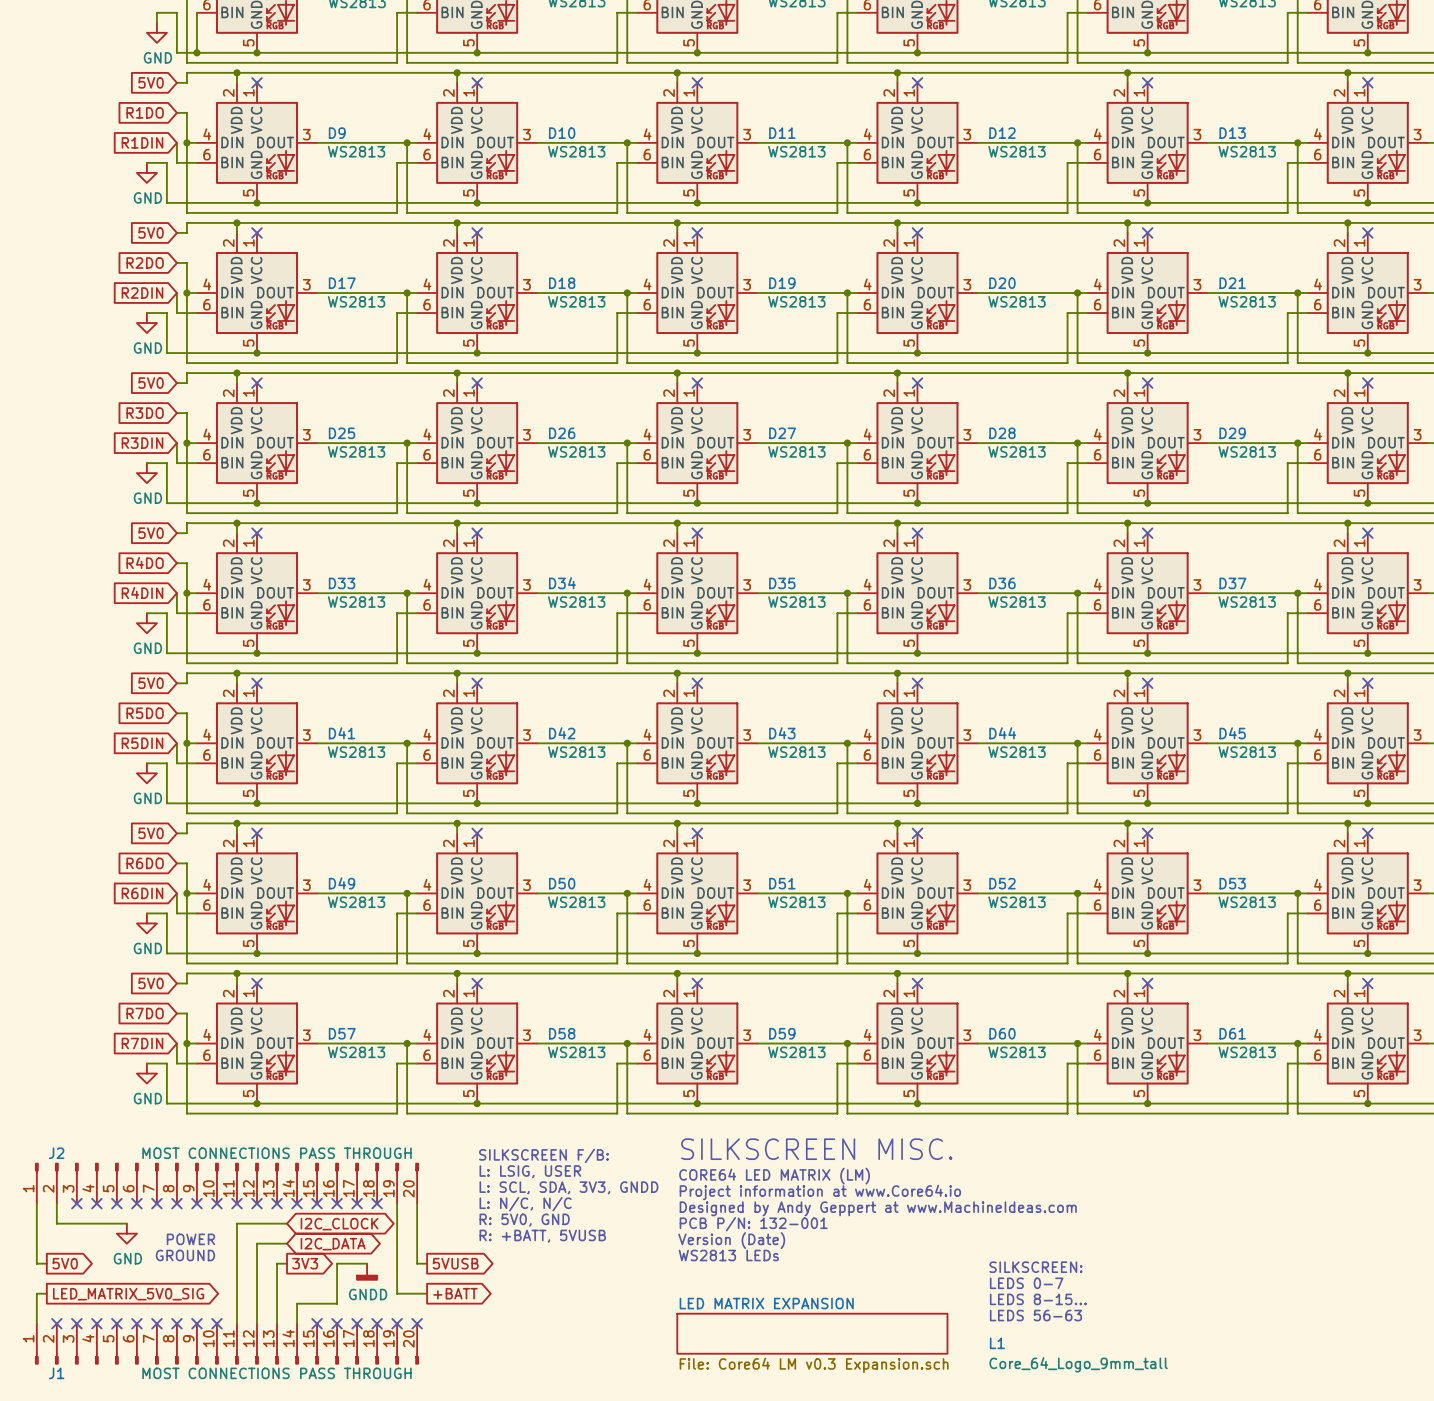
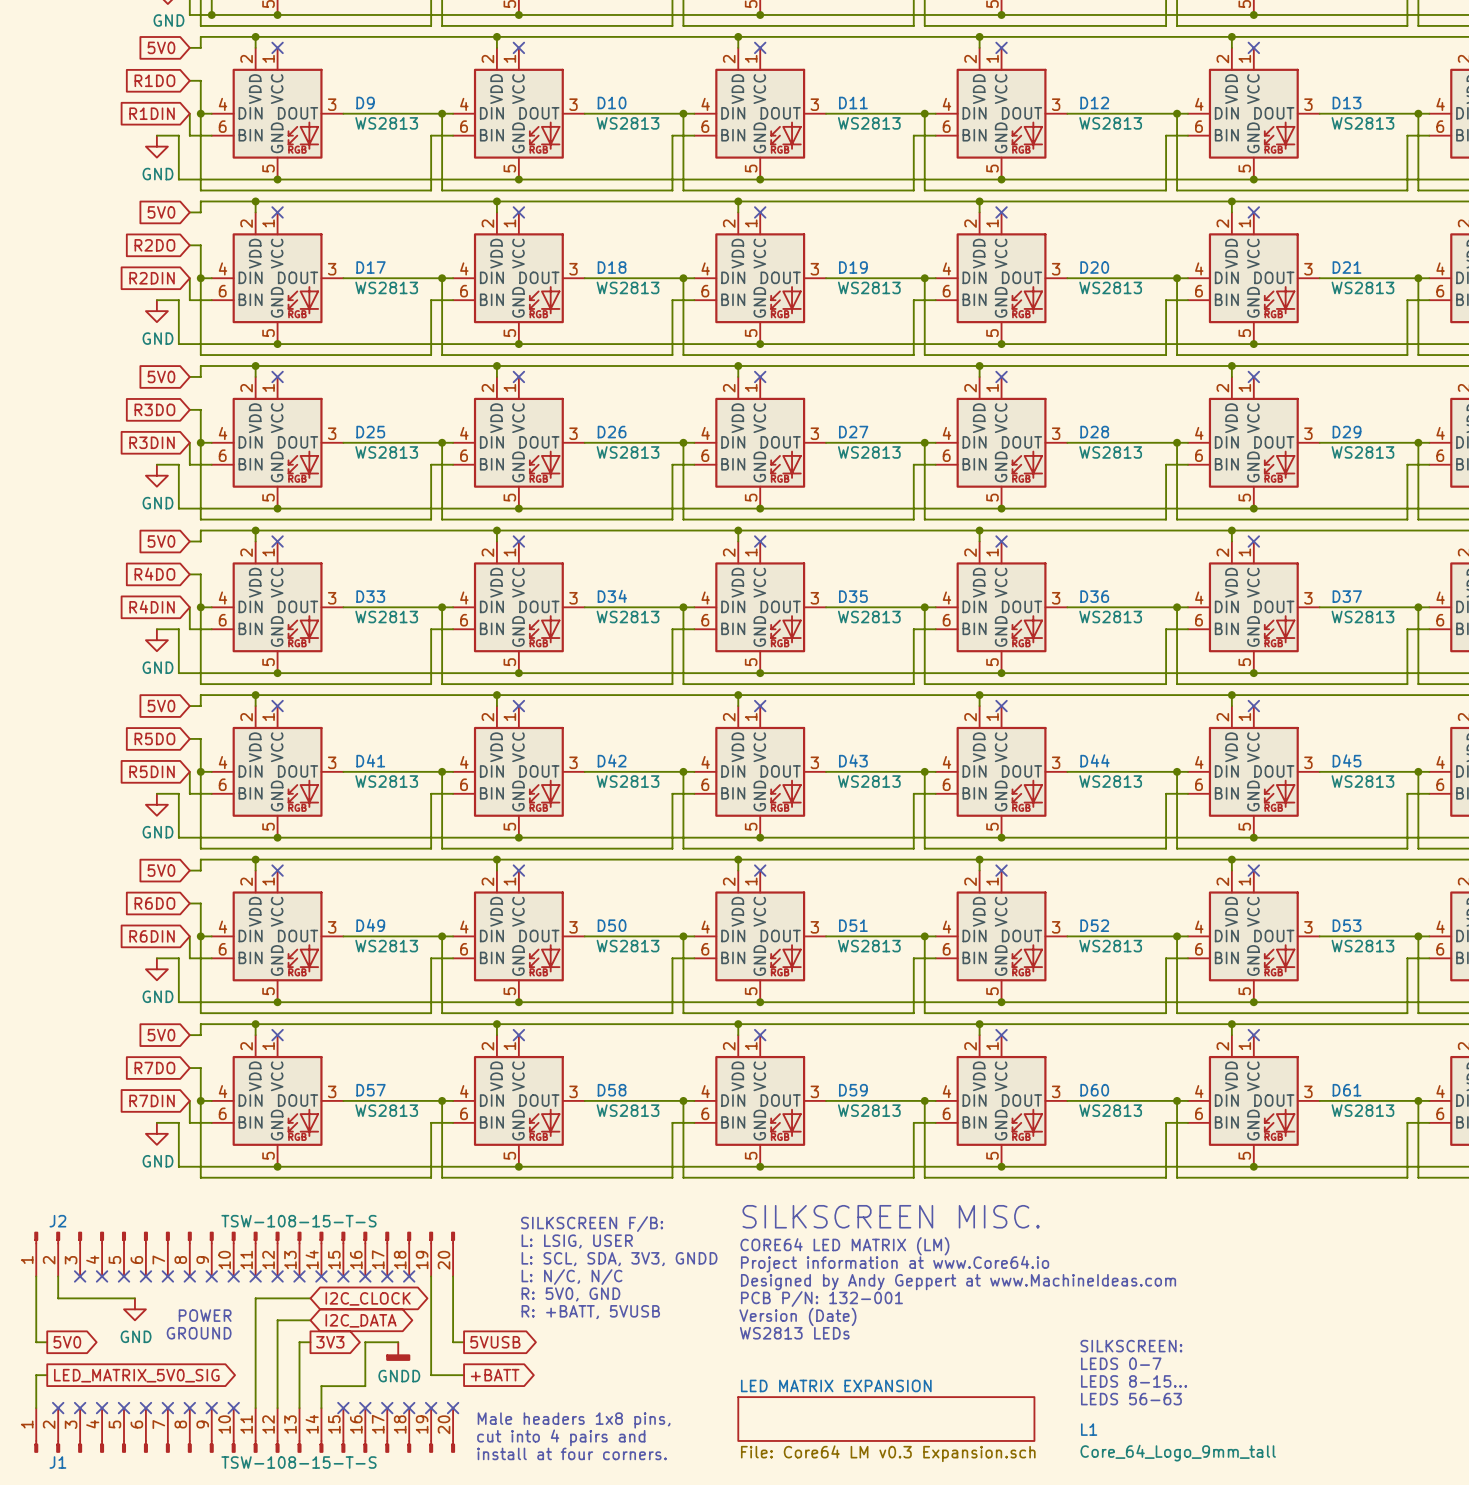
J2 value: MOST CONNECTIONS PASS THROUGH (277, 1153) -> TSW-108-15-T-S (298, 1221)
text: none -> Male headers 1x8 pins, (574, 1420)
text: none -> cut into 4 pairs and (561, 1437)
text: none -> install at four corners. (571, 1453)
J1 value: MOST CONNECTIONS PASS THROUGH (277, 1373) -> TSW-108-15-T-S (298, 1462)

